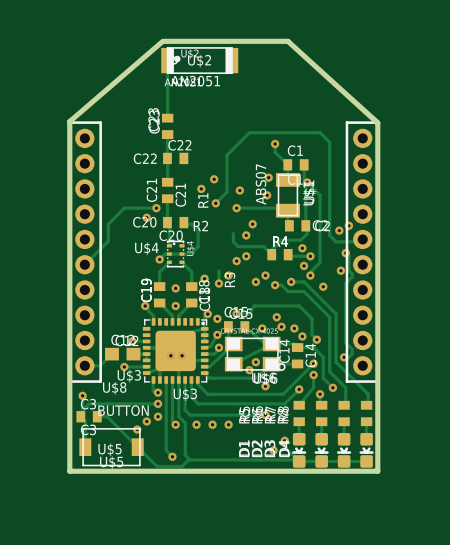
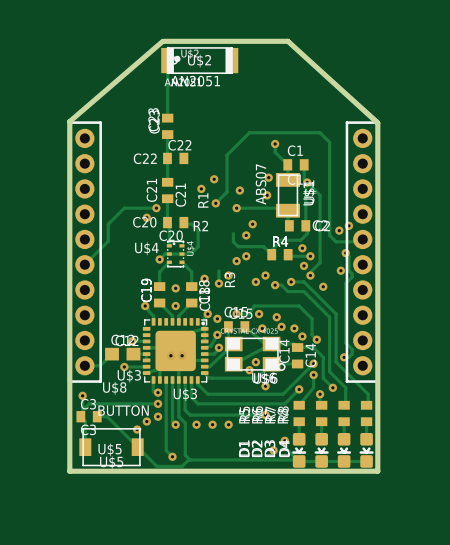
via: none -> (259, 314)

